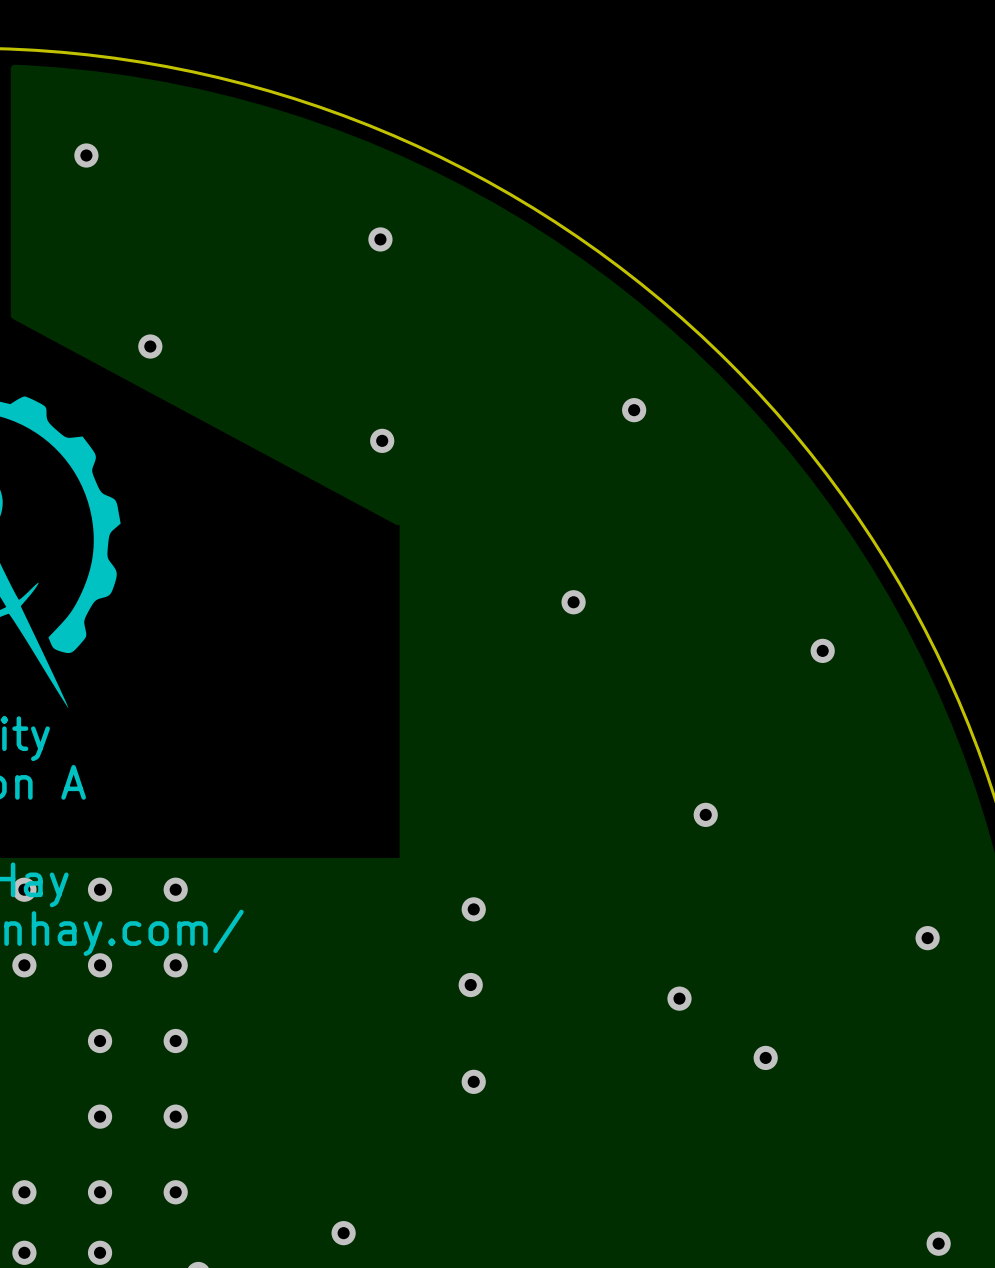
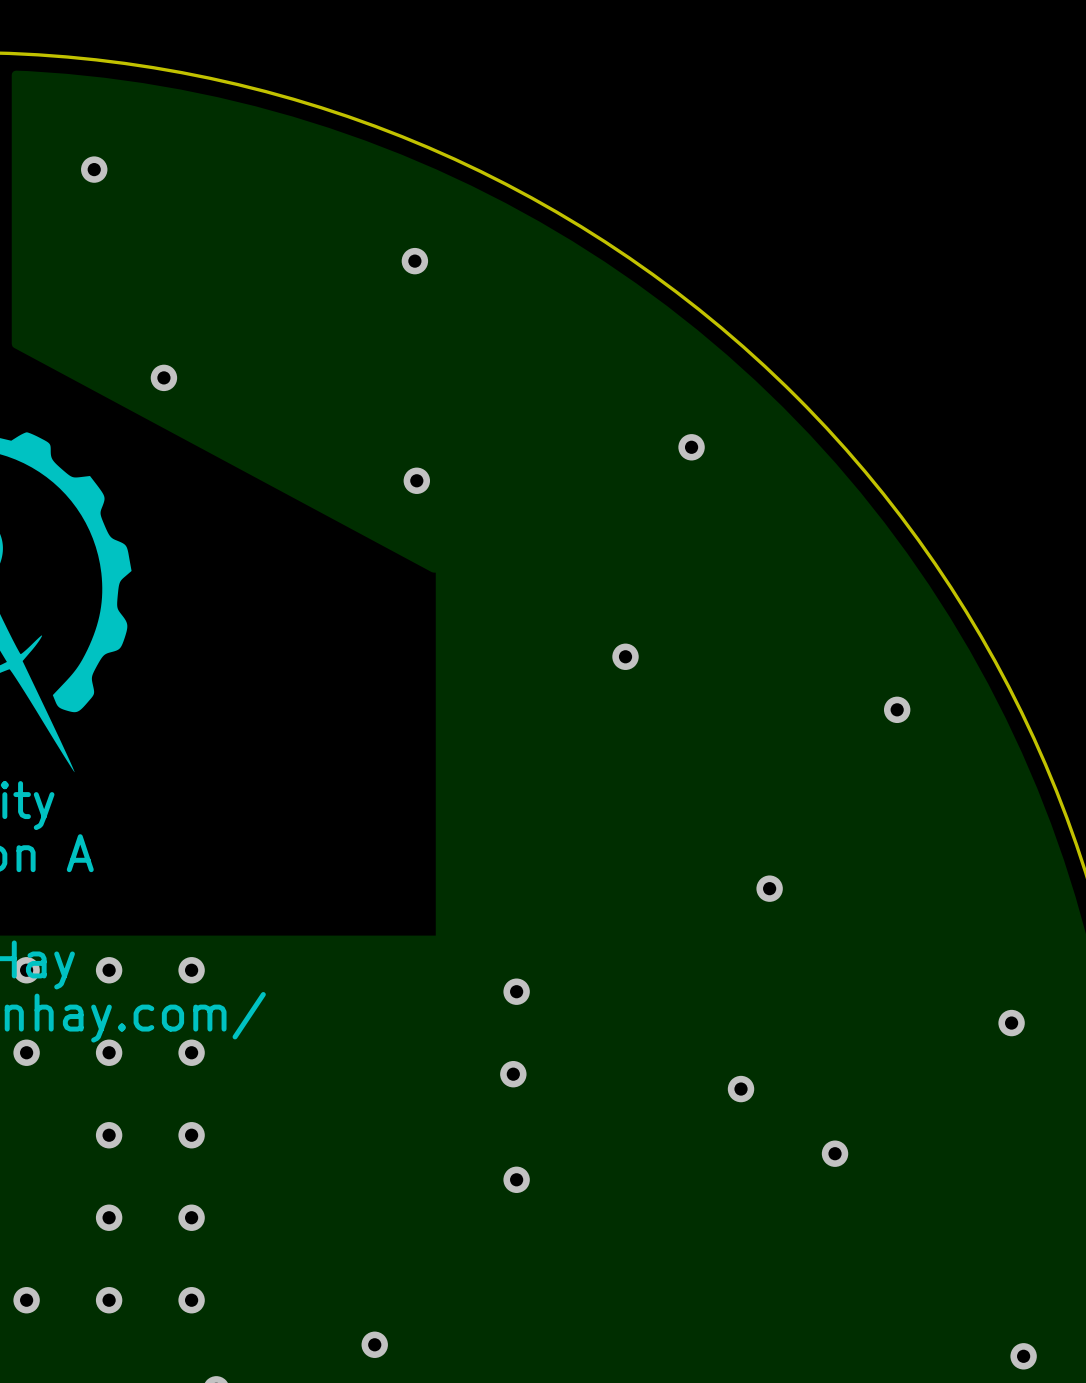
via: (24, 1252) -> none
via: (100, 1252) -> none

